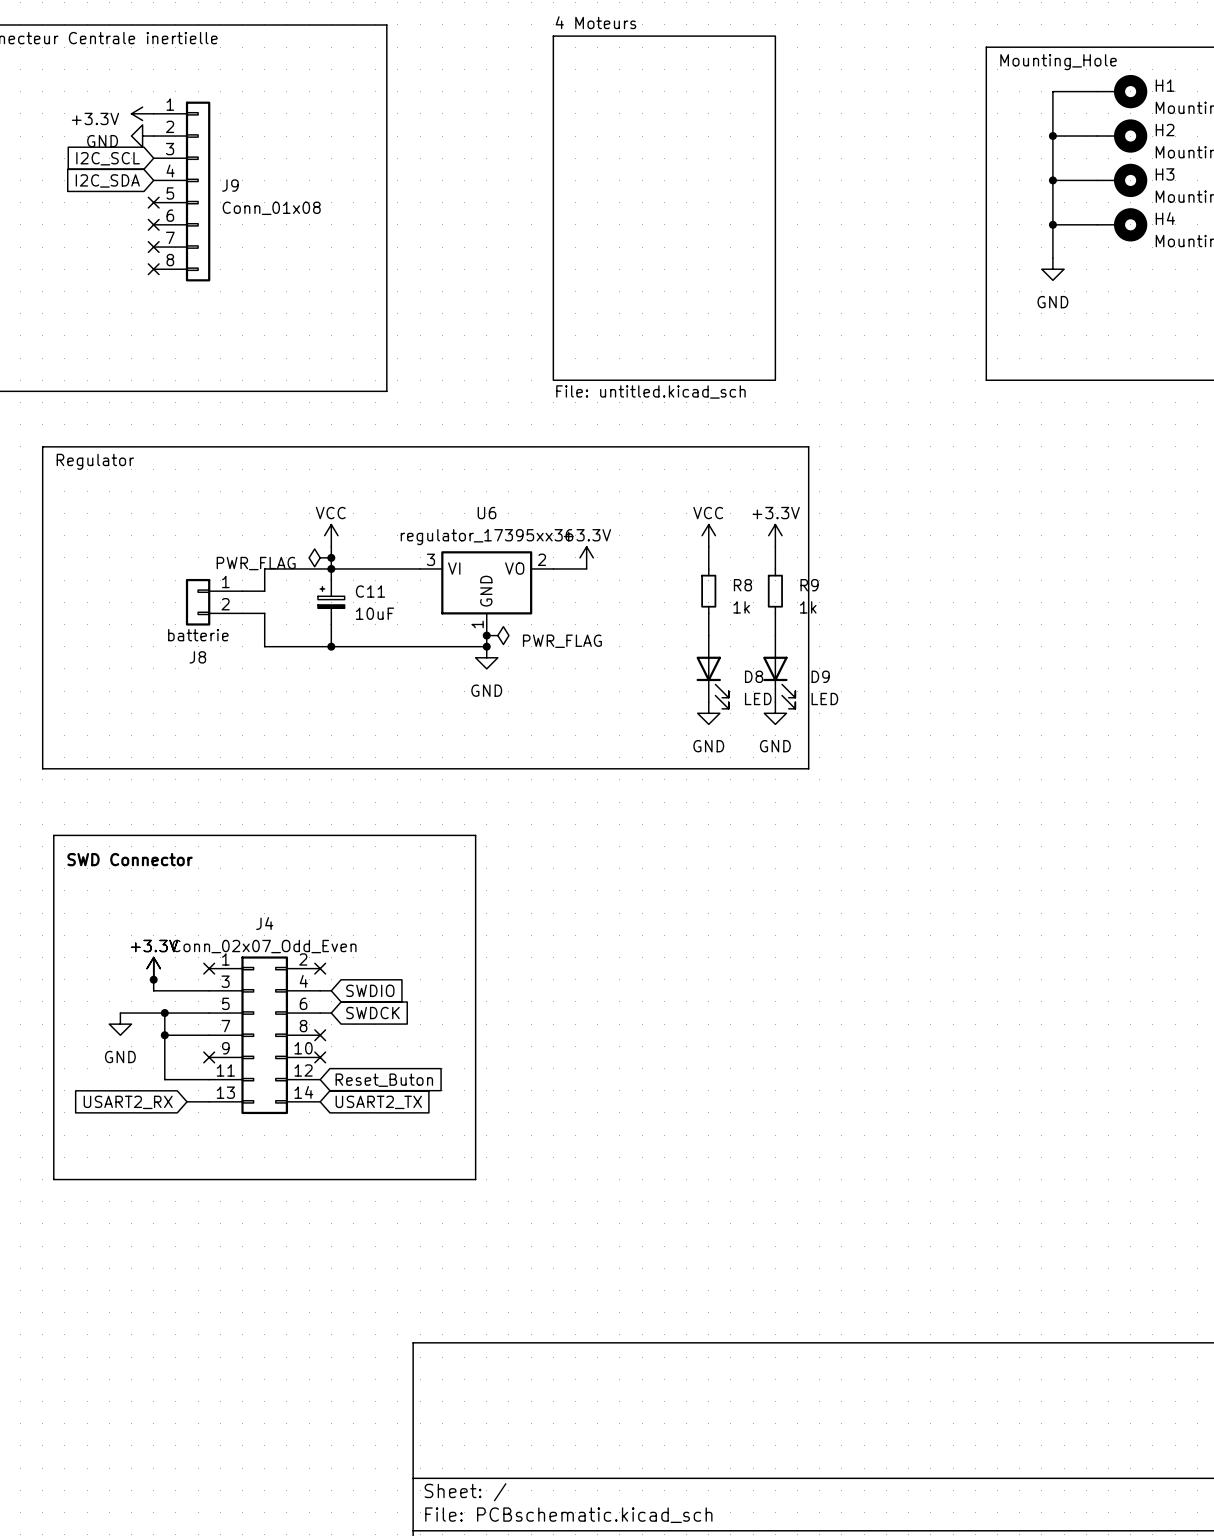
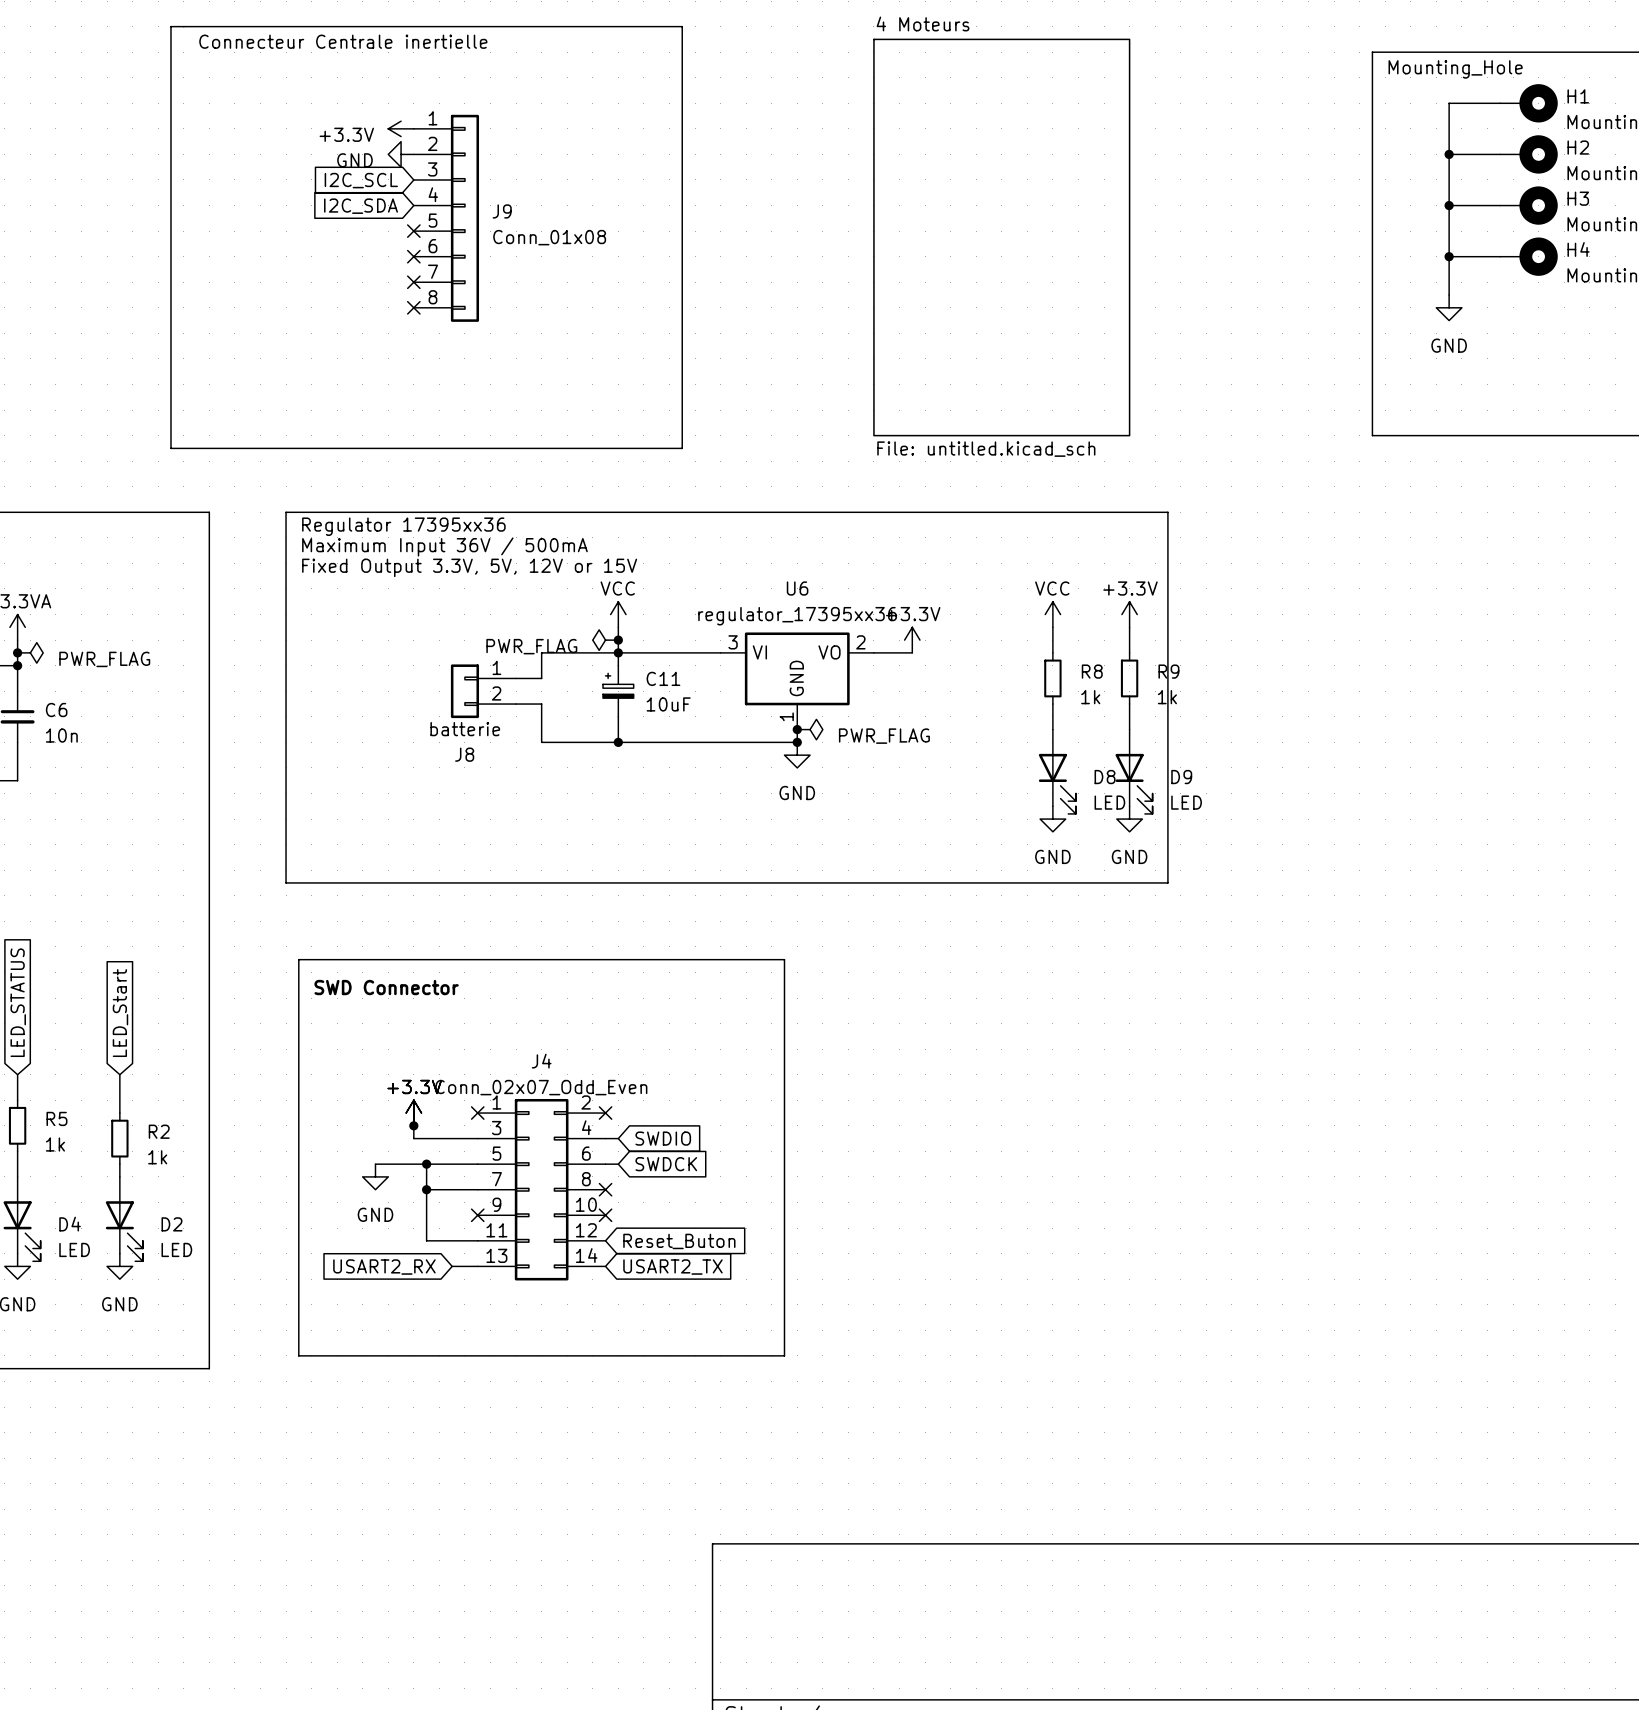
text: Regulator (95, 461) -> Regulator 17395xx36 (403, 526)
text: none -> Maximum Input 36V / 500mA (444, 546)
text: none -> Fixed Output 3.3V, 5V, 12V or 15V (469, 567)

